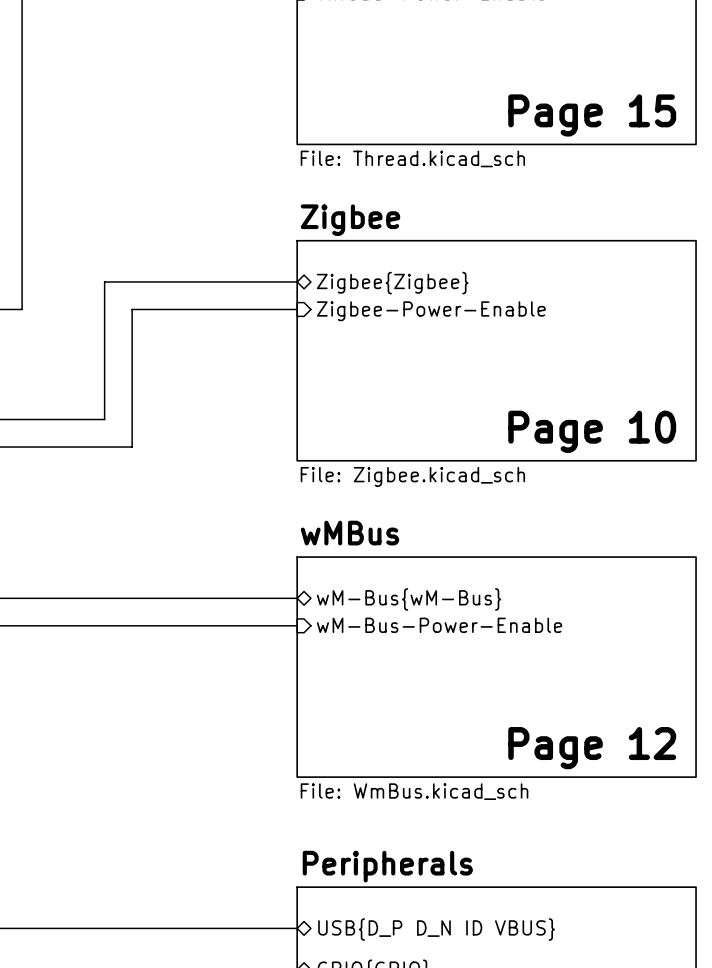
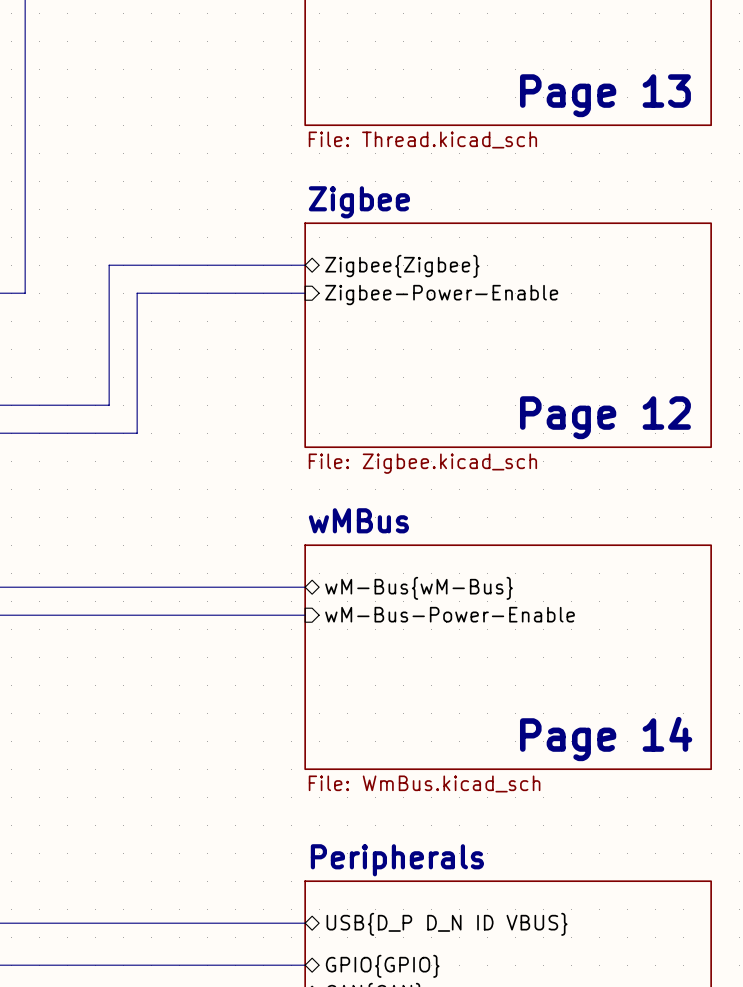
text: Page 15 (592, 115) -> Page 13 (605, 95)
text: Page 10 (592, 431) -> Page 12 (605, 417)
text: Page 12 (592, 748) -> Page 14 (606, 739)

